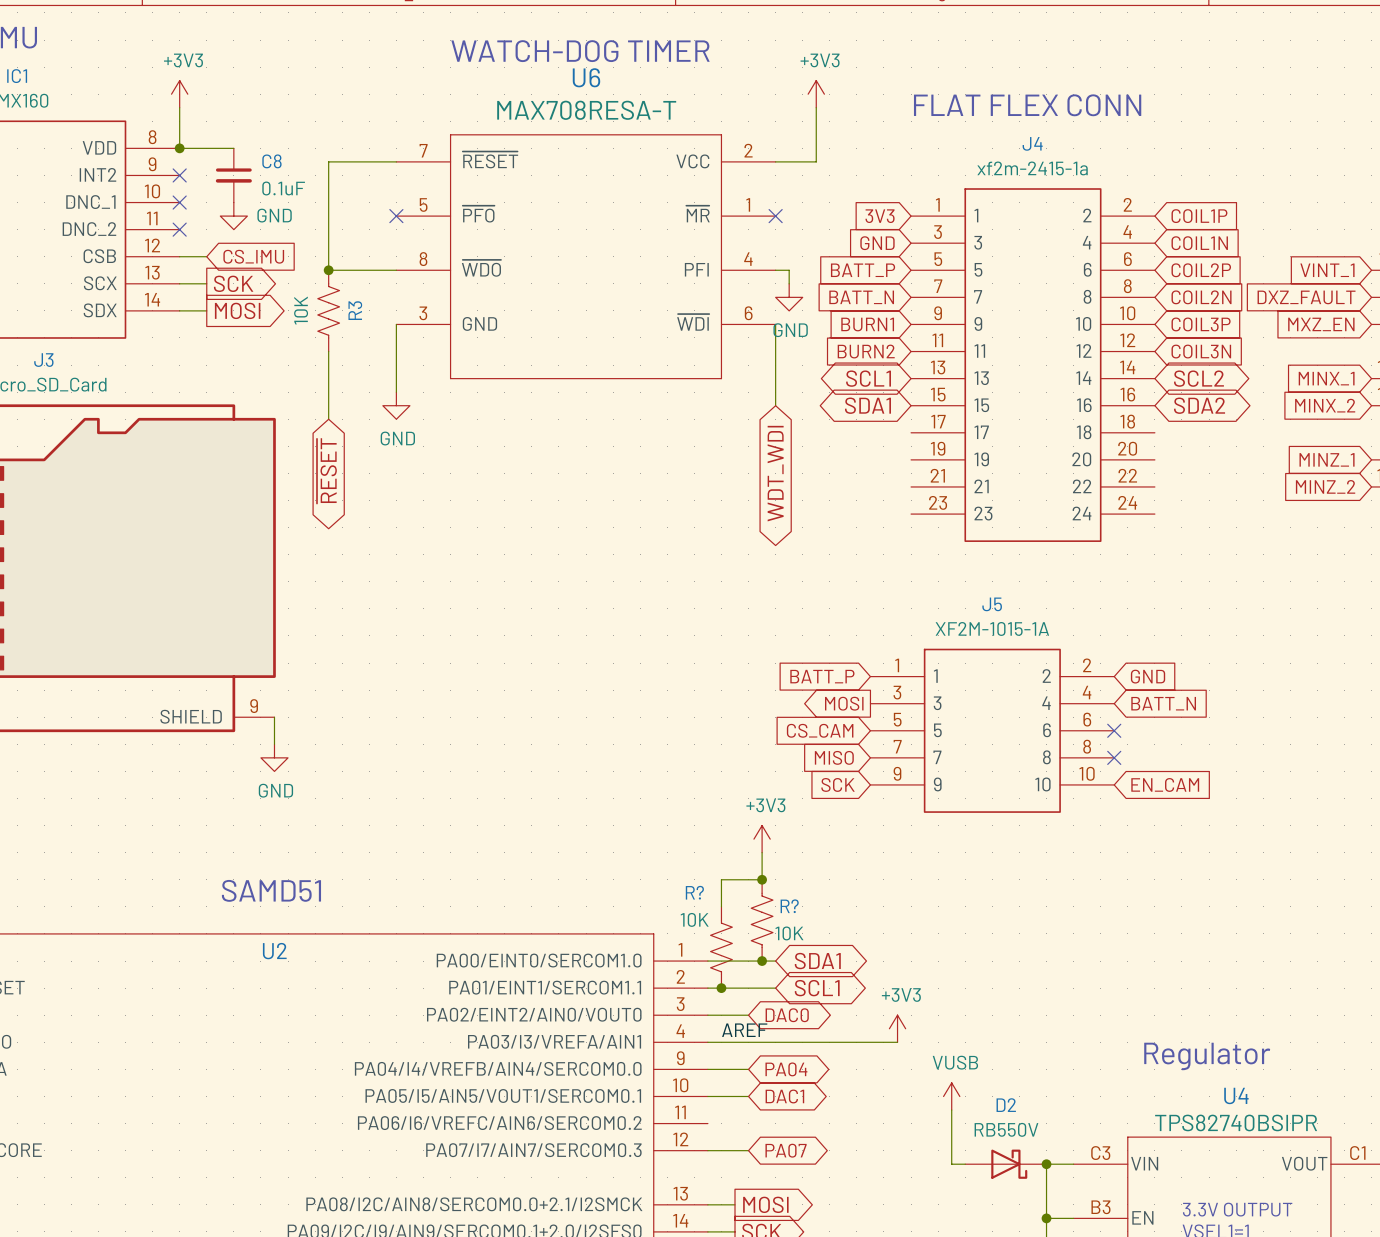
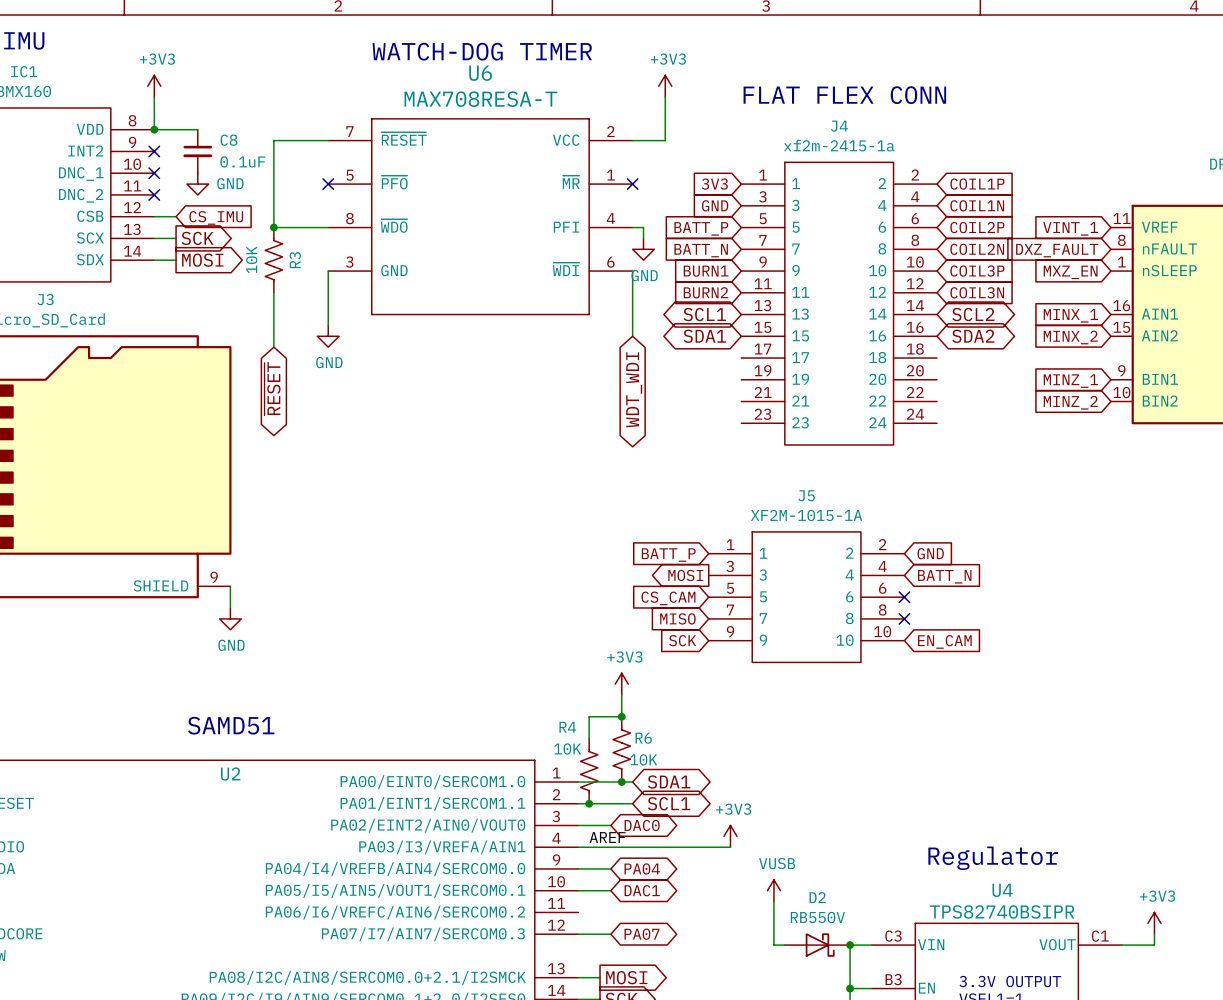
R? name: R? (694, 892) -> R4 (567, 727)
R? name: R? (789, 906) -> R6 (643, 738)

